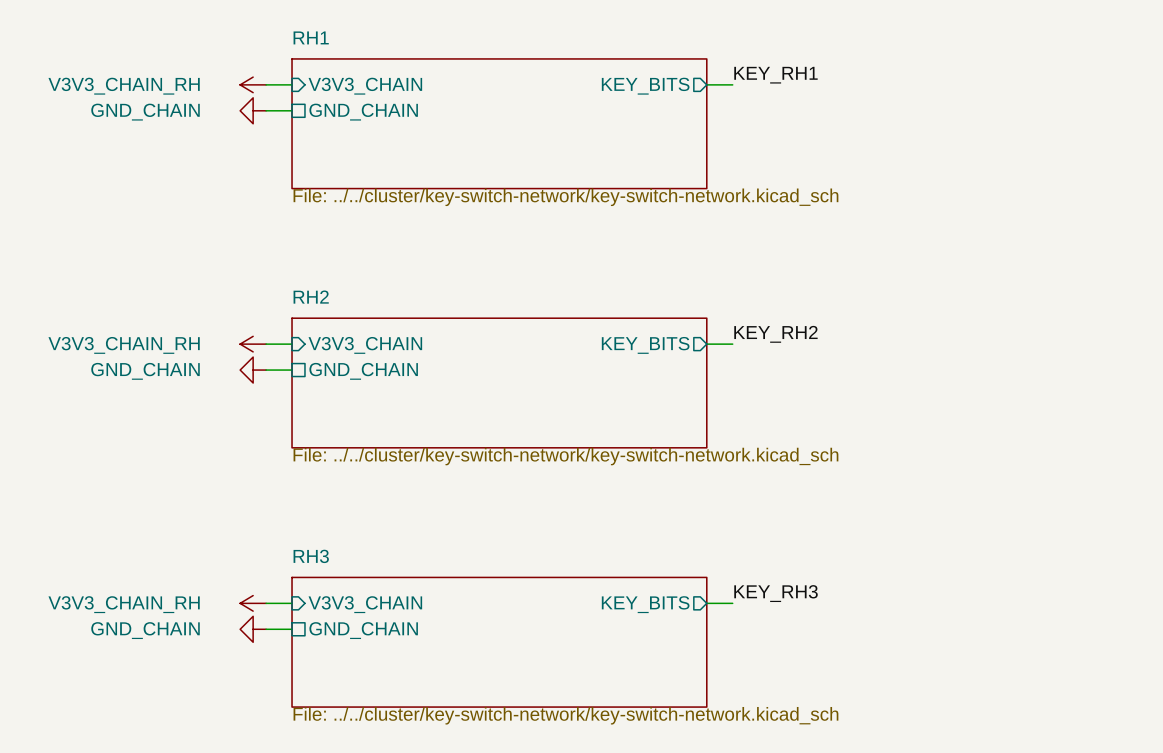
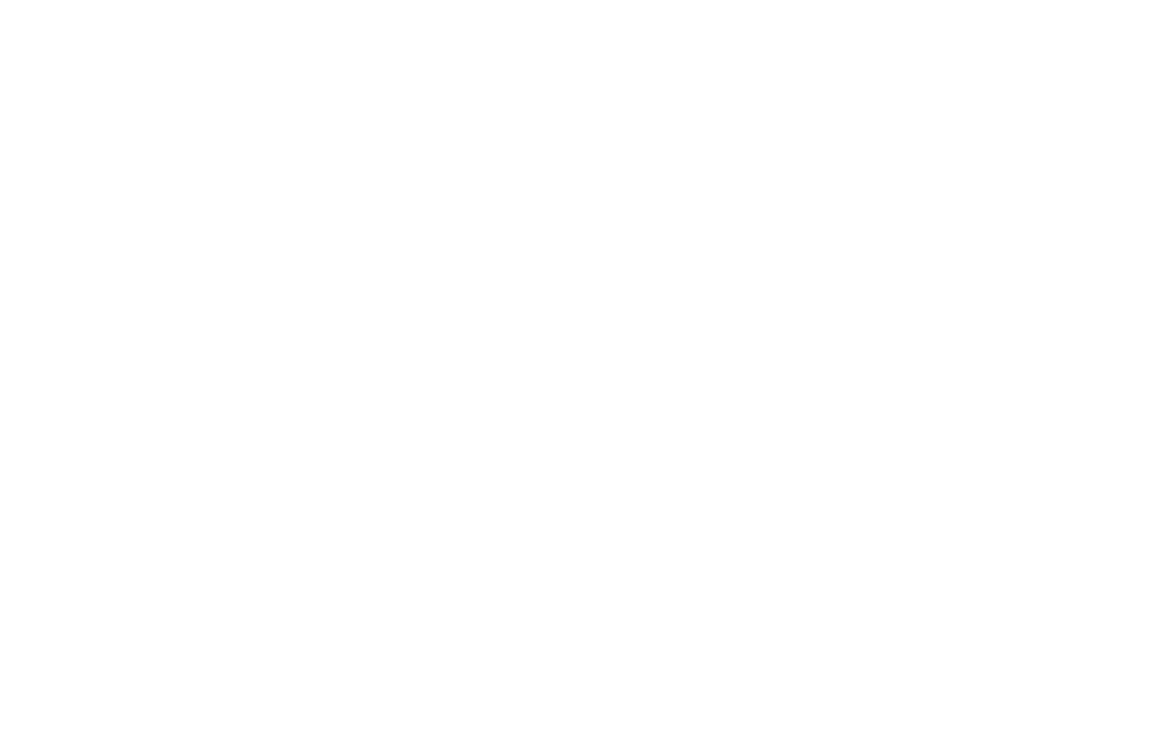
label: KEY_RH1 (775, 75) -> none
power symbol: V3V3_CHAIN_RH (253, 84) -> none
wire: (266, 84) (292, 84) -> none
wire: (706, 84) (732, 84) -> none
sheet pin: V3V3_CHAIN (365, 86) -> none
sheet pin: KEY_BITS (645, 86) -> none
power symbol: GND_CHAIN (253, 110) -> none
wire: (266, 110) (292, 110) -> none
sheet pin: GND_CHAIN (363, 112) -> none
sheet RH1: File: ../../cluster/key-switch-network/key-switch-network.kicad_sch (499, 123) -> none
label: KEY_RH2 (775, 334) -> none
power symbol: V3V3_CHAIN_RH (253, 344) -> none
wire: (266, 344) (292, 344) -> none
wire: (706, 344) (732, 344) -> none
sheet pin: V3V3_CHAIN (365, 345) -> none
sheet pin: KEY_BITS (645, 345) -> none
power symbol: GND_CHAIN (253, 370) -> none
wire: (266, 370) (292, 370) -> none
sheet pin: GND_CHAIN (363, 371) -> none
sheet RH2: File: ../../cluster/key-switch-network/key-switch-network.kicad_sch (499, 383) -> none
label: KEY_RH3 (776, 593) -> none
power symbol: V3V3_CHAIN_RH (253, 603) -> none
wire: (266, 603) (292, 603) -> none
wire: (706, 603) (732, 603) -> none
sheet pin: V3V3_CHAIN (365, 604) -> none
sheet pin: KEY_BITS (645, 604) -> none
power symbol: GND_CHAIN (253, 629) -> none
wire: (266, 629) (292, 629) -> none
sheet pin: GND_CHAIN (363, 630) -> none
sheet RH3: File: ../../cluster/key-switch-network/key-switch-network.kicad_sch (499, 642) -> none

